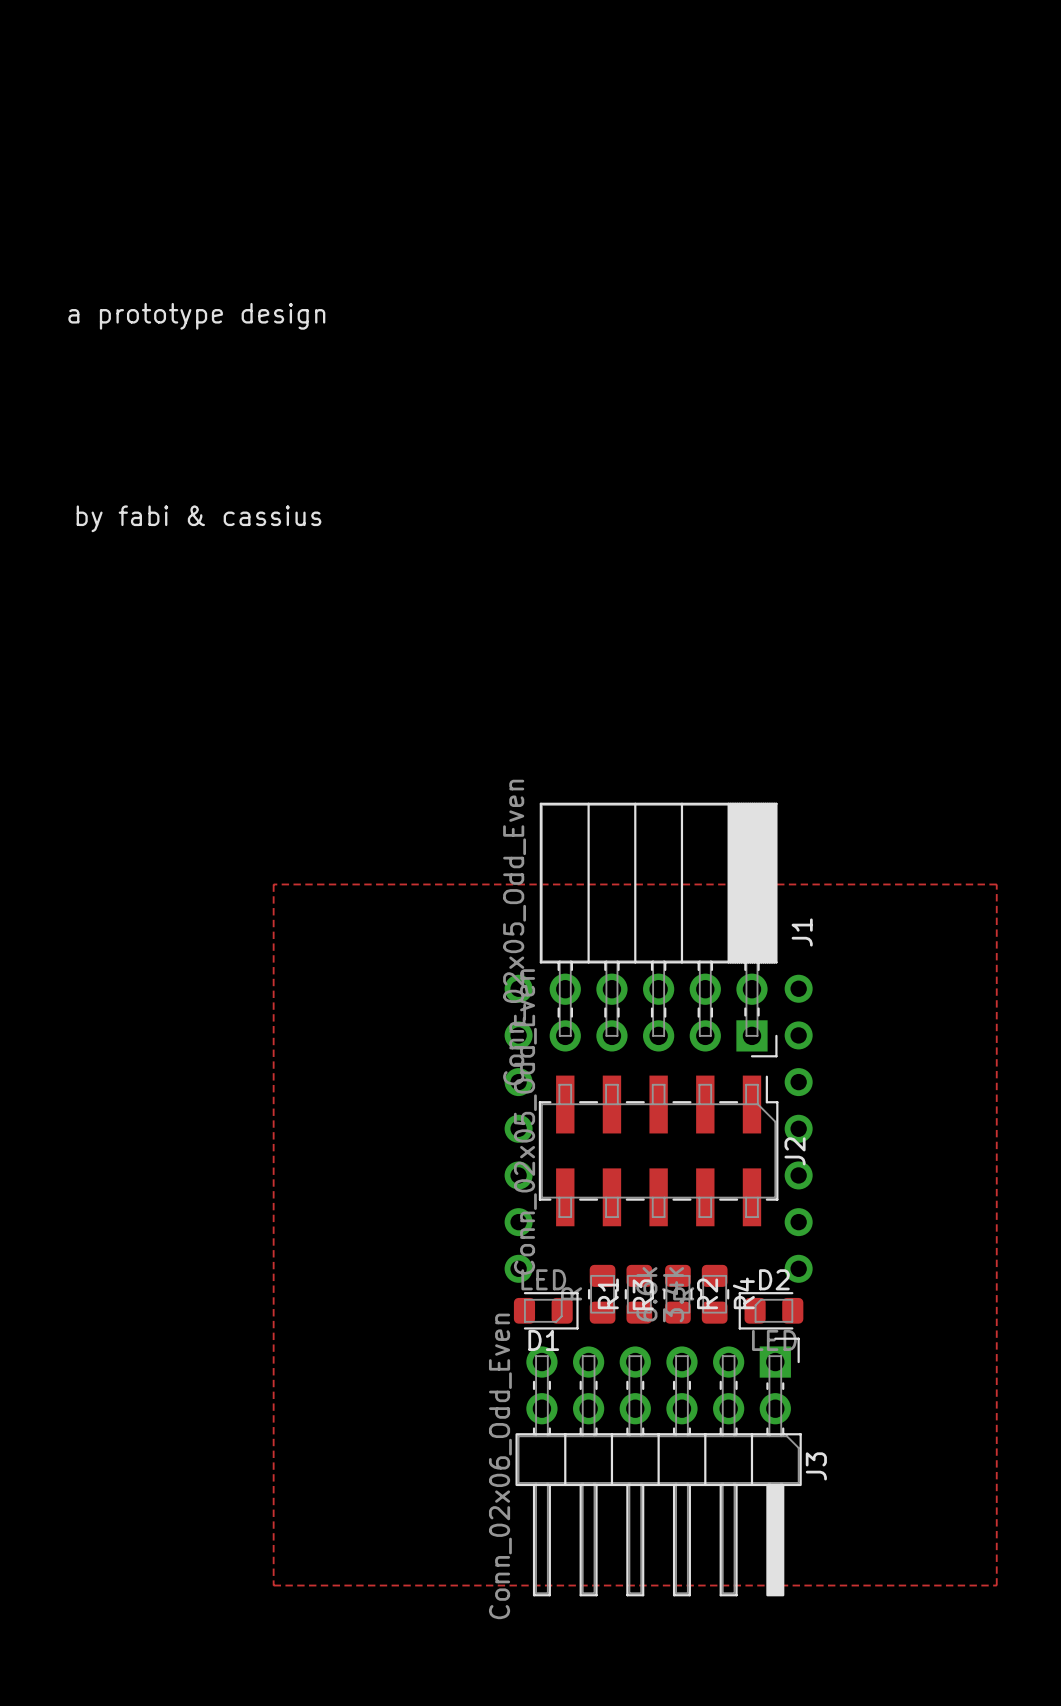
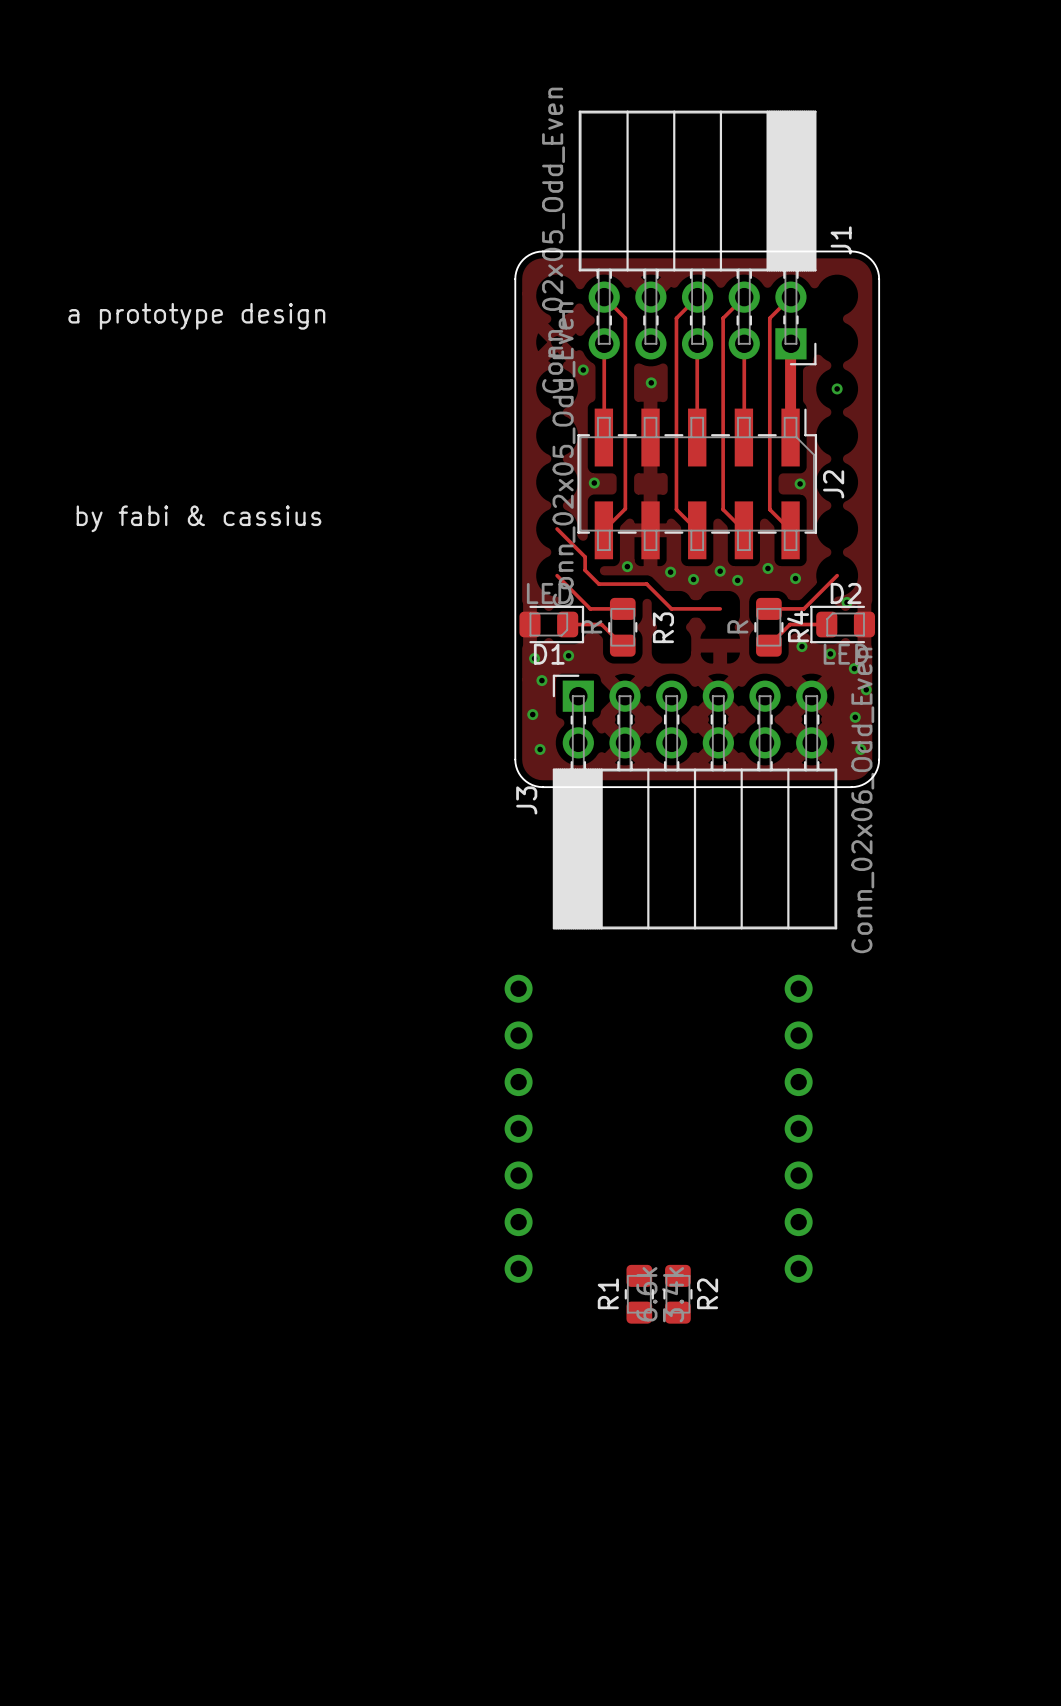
board edge: none -> (542, 251) (851, 251) (865, 255) (875, 265) (879, 279) (879, 759) (875, 773) (865, 783) (851, 787) (542, 787) (529, 783) (518, 773) (515, 759) (515, 279) (517, 268) (523, 259) (532, 253) (542, 251)
track: none -> (604, 297) (625, 318) (625, 508) (603, 530)
track: none -> (697, 297) (676, 318) (676, 509) (697, 530)
track: none -> (744, 297) (723, 318) (723, 509) (743, 530)
track: none -> (790, 297) (769, 318) (769, 509) (790, 530)
track: none -> (604, 343) (603, 437)
track: none -> (697, 343) (697, 437)
track: none -> (744, 343) (743, 437)
track: none -> (790, 343) (790, 412)
via: none -> (583, 370)
via: none -> (651, 382)
via: none -> (837, 388)
via: none -> (594, 483)
via: none -> (800, 483)
track: none -> (557, 528) (585, 556) (585, 570) (598, 584) (646, 584) (671, 608) (720, 608)
via: none -> (627, 566)
via: none -> (767, 568)
via: none -> (720, 571)
via: none -> (670, 572)
track: none -> (557, 575) (590, 608) (622, 608)
track: none -> (837, 575) (803, 608) (768, 608)
via: none -> (795, 578)
via: none -> (693, 579)
via: none -> (737, 580)
via: none -> (846, 602)
track: none -> (567, 624) (601, 624) (622, 645)
track: none -> (826, 624) (790, 624) (768, 645)
via: none -> (801, 646)
via: none -> (830, 653)
via: none -> (568, 655)
via: none -> (534, 658)
via: none -> (854, 668)
via: none -> (541, 680)
via: none -> (866, 689)
via: none -> (532, 714)
via: none -> (855, 717)
via: none -> (540, 749)
via: none -> (860, 749)
zone outline: (273, 884) (996, 884) (996, 1585) (273, 1585) (273, 884) -> none
J1 position: (658, 930) -> (697, 237)
J2 position: (658, 1150) -> (697, 483)
R3 position: (602, 1294) -> (622, 627)
R4 position: (714, 1294) -> (768, 627)
D1 position: (546, 1310) -> (551, 624)
D2 position: (771, 1310) -> (842, 624)
J3 footprint: [515, 1337, 802, 1597] -> [552, 674, 838, 930]
J3 value position: Conn_02x06_Odd_Even (500, 1466) -> Conn_02x06_Odd_Even (862, 800)
J3 name position: J3 (816, 1466) -> J3 (526, 800)

